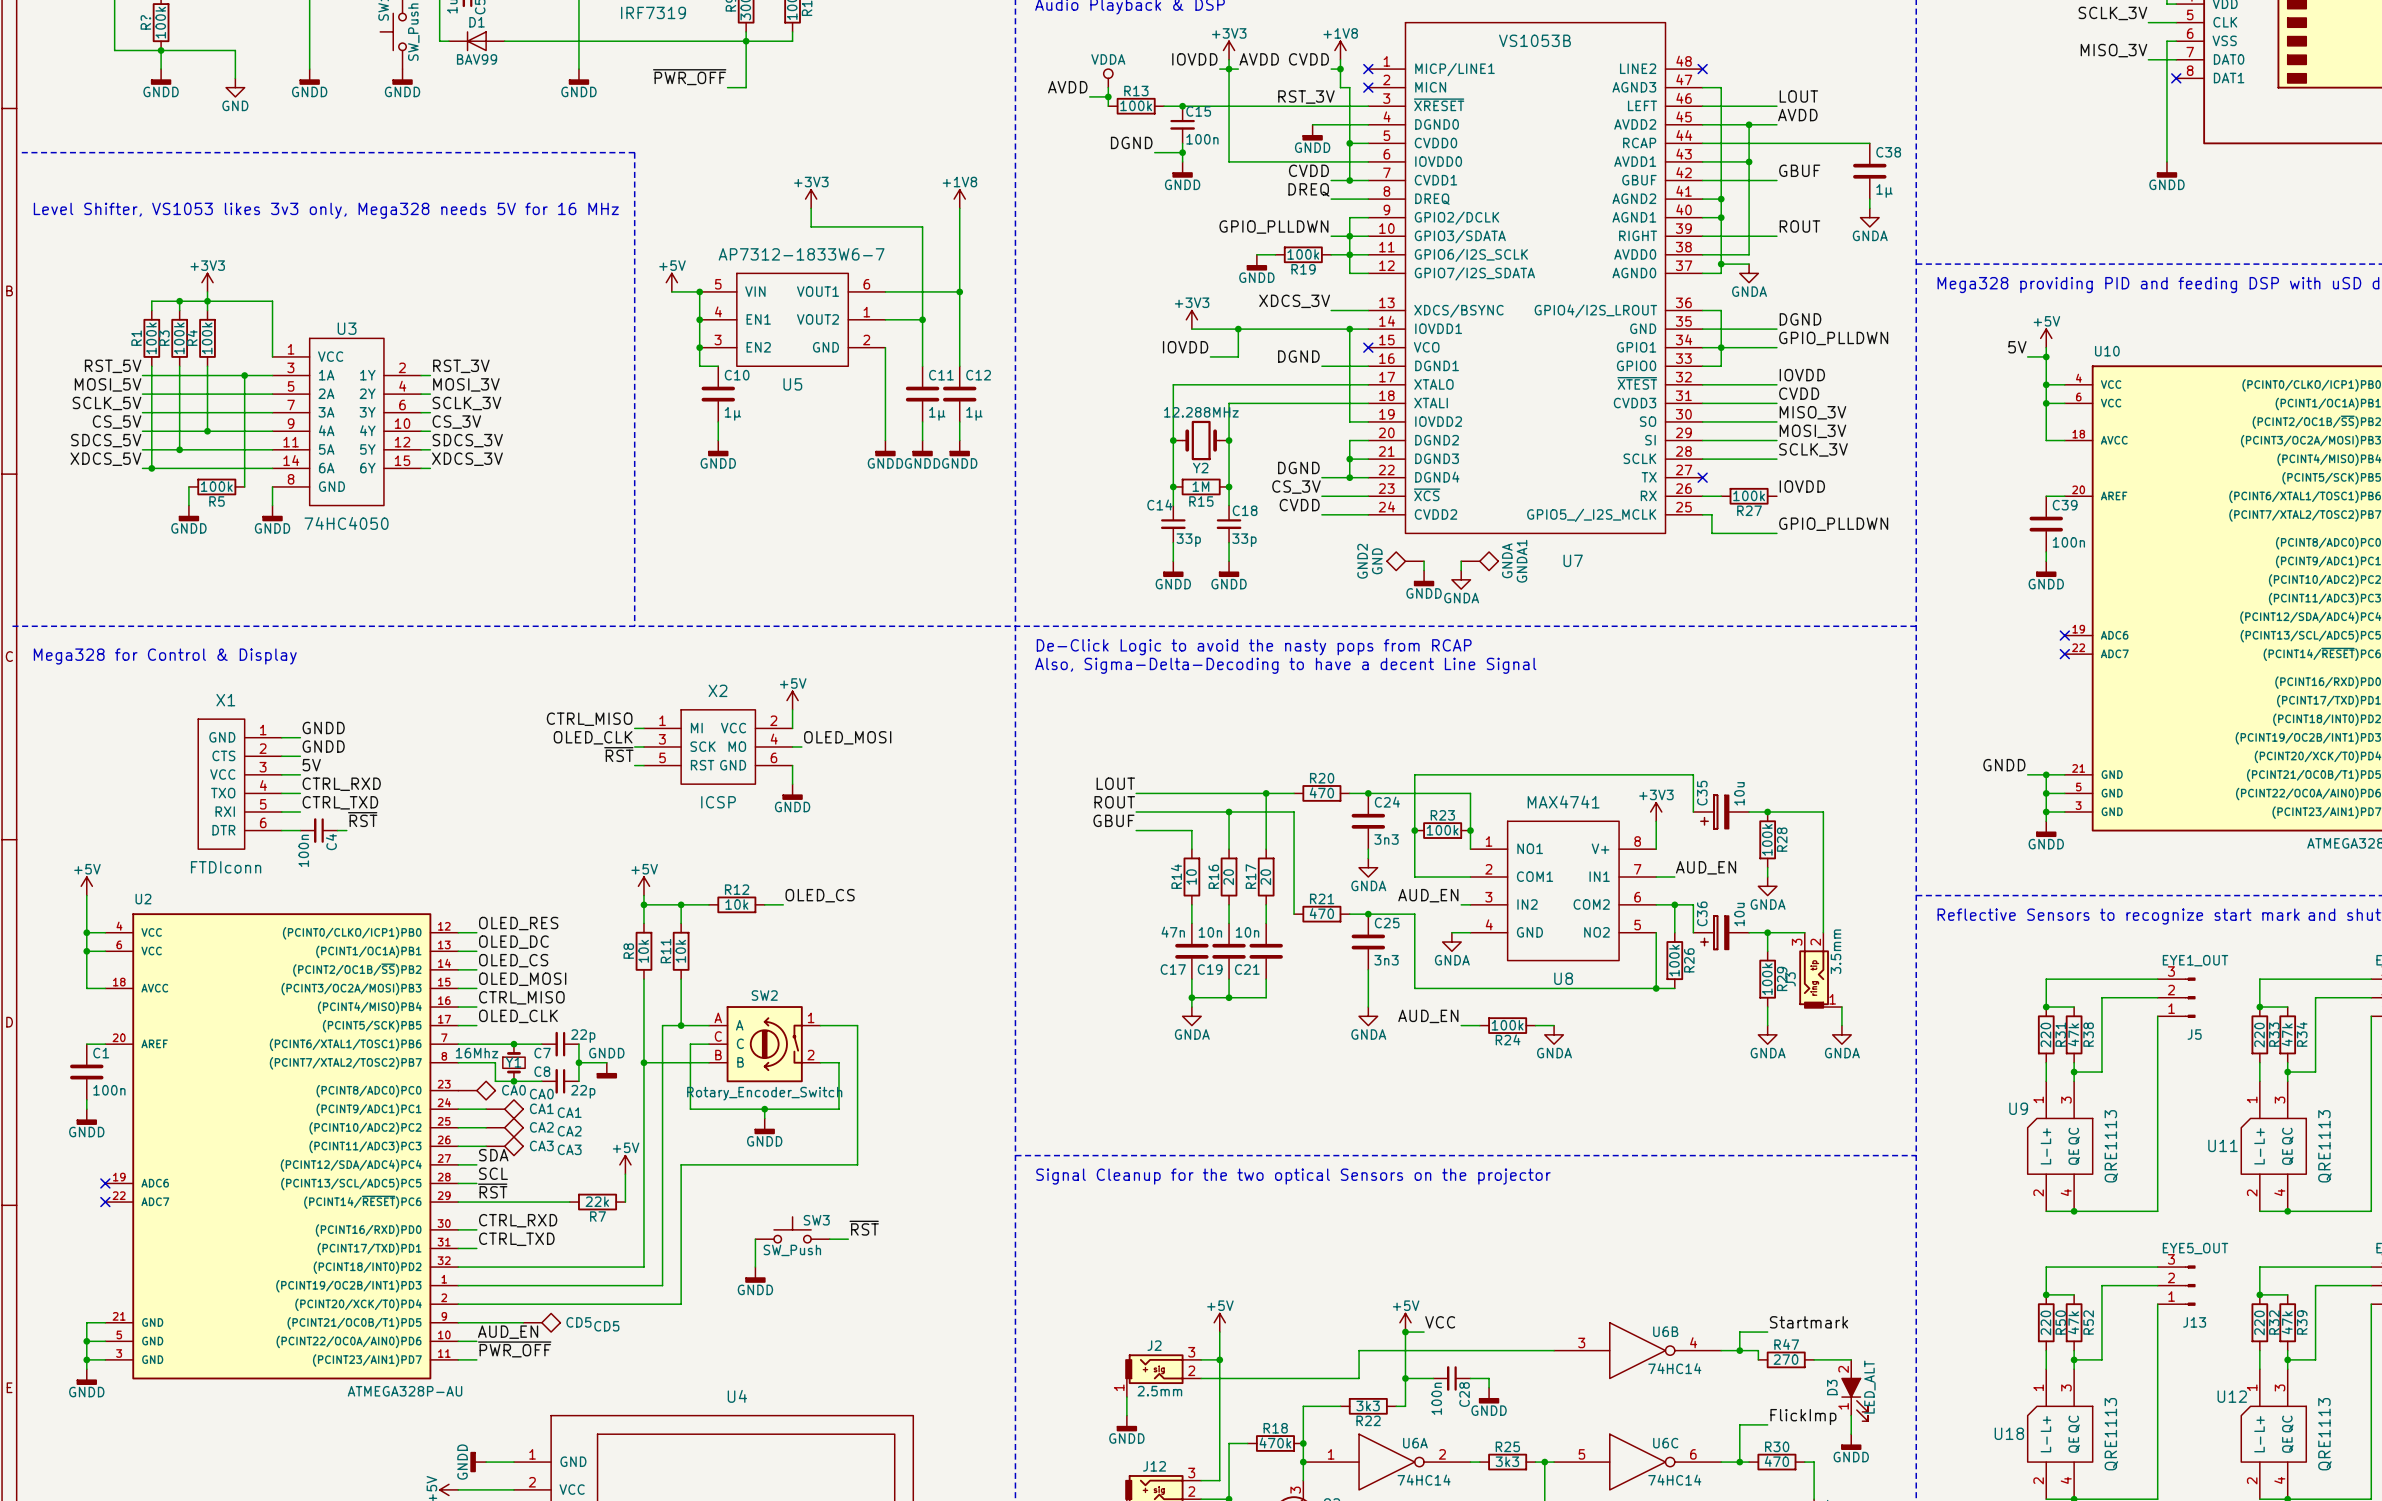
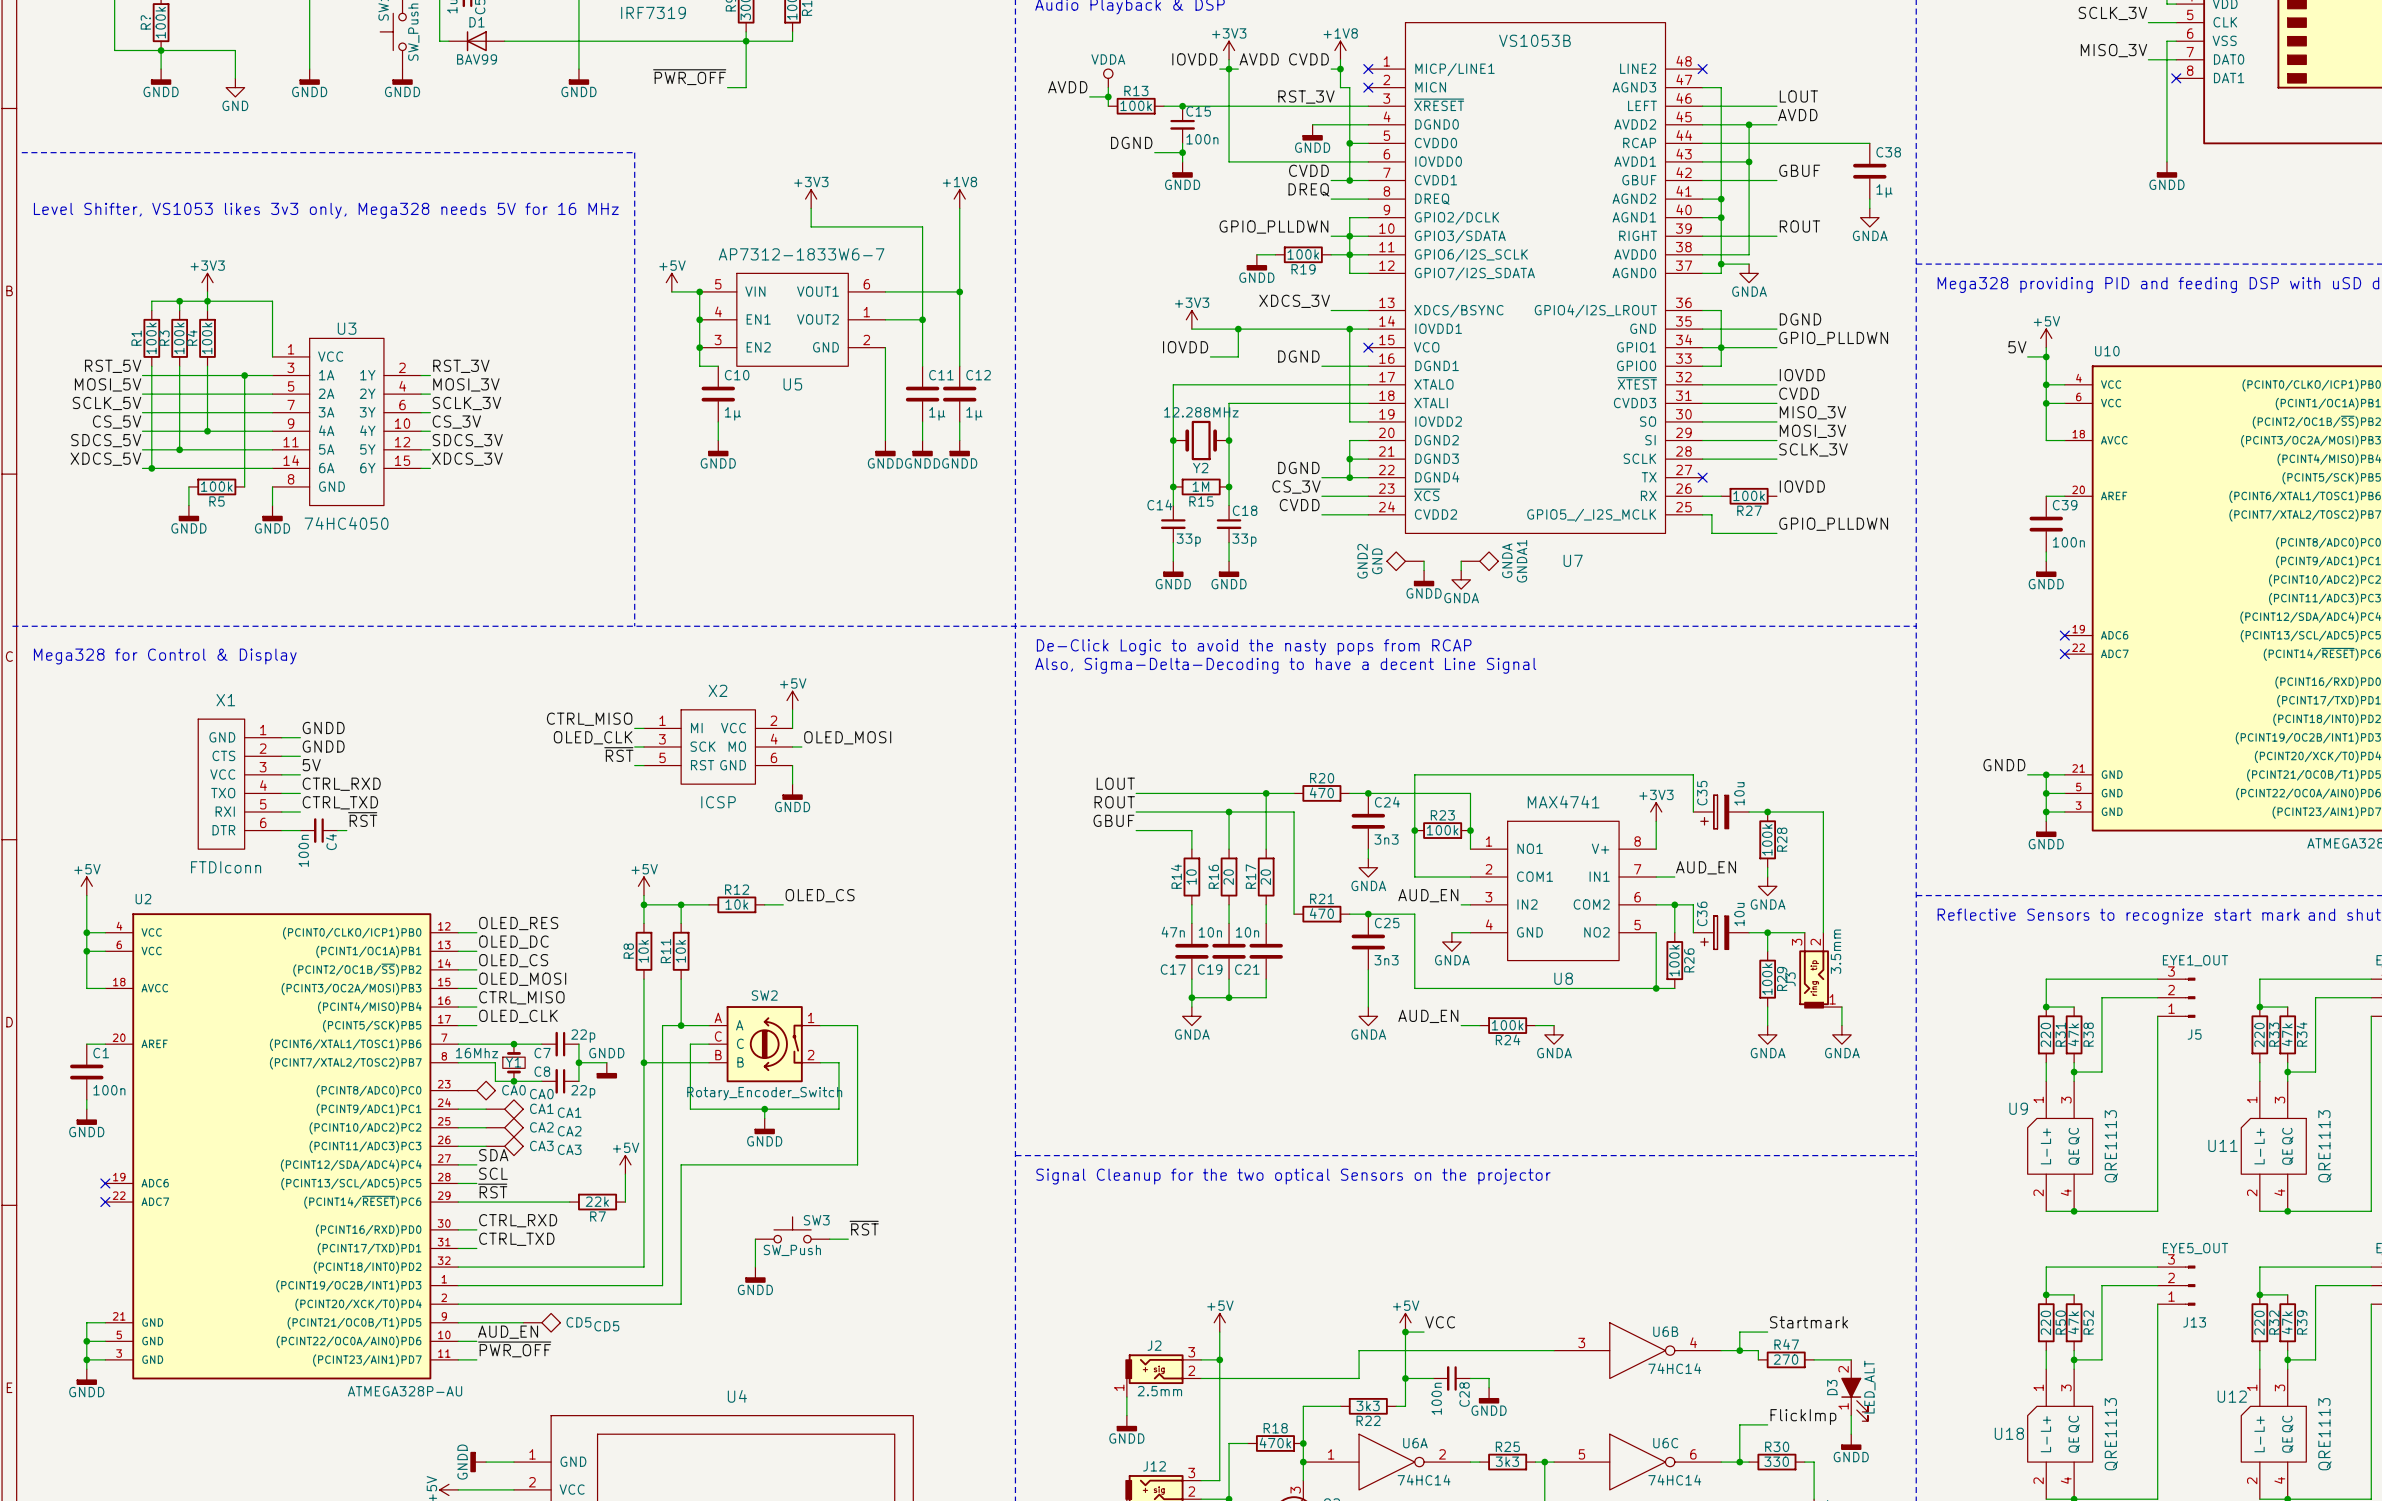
R30 value: 470 (1776, 1461) -> 330 (1776, 1461)

